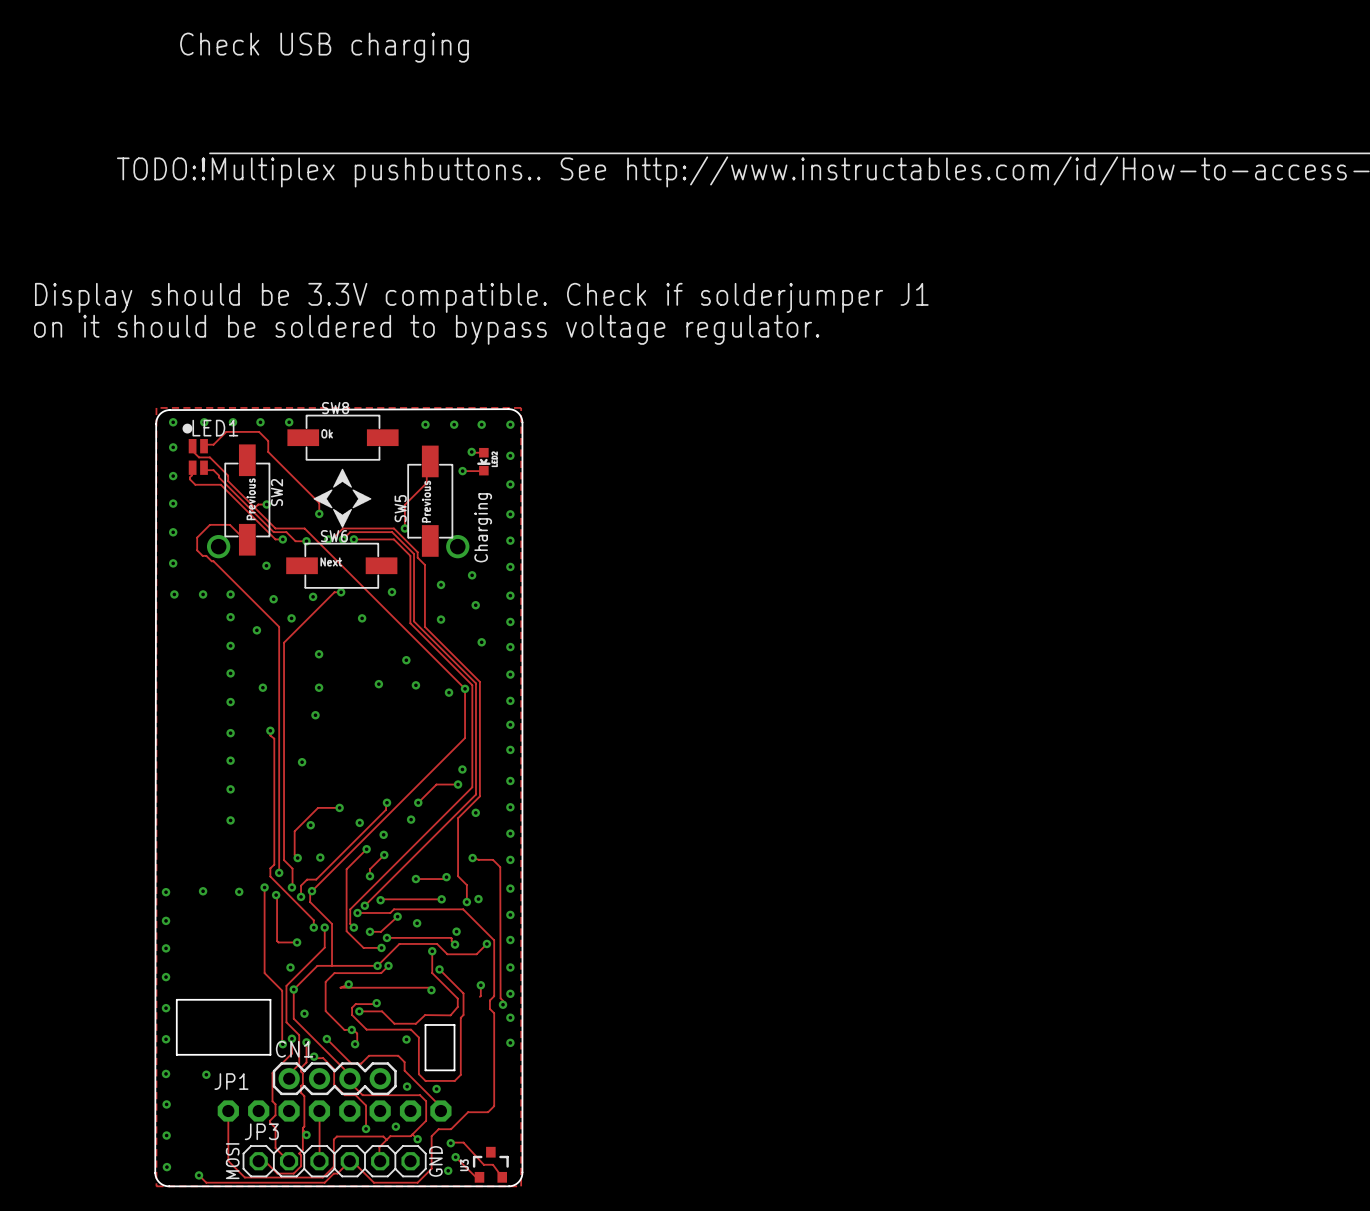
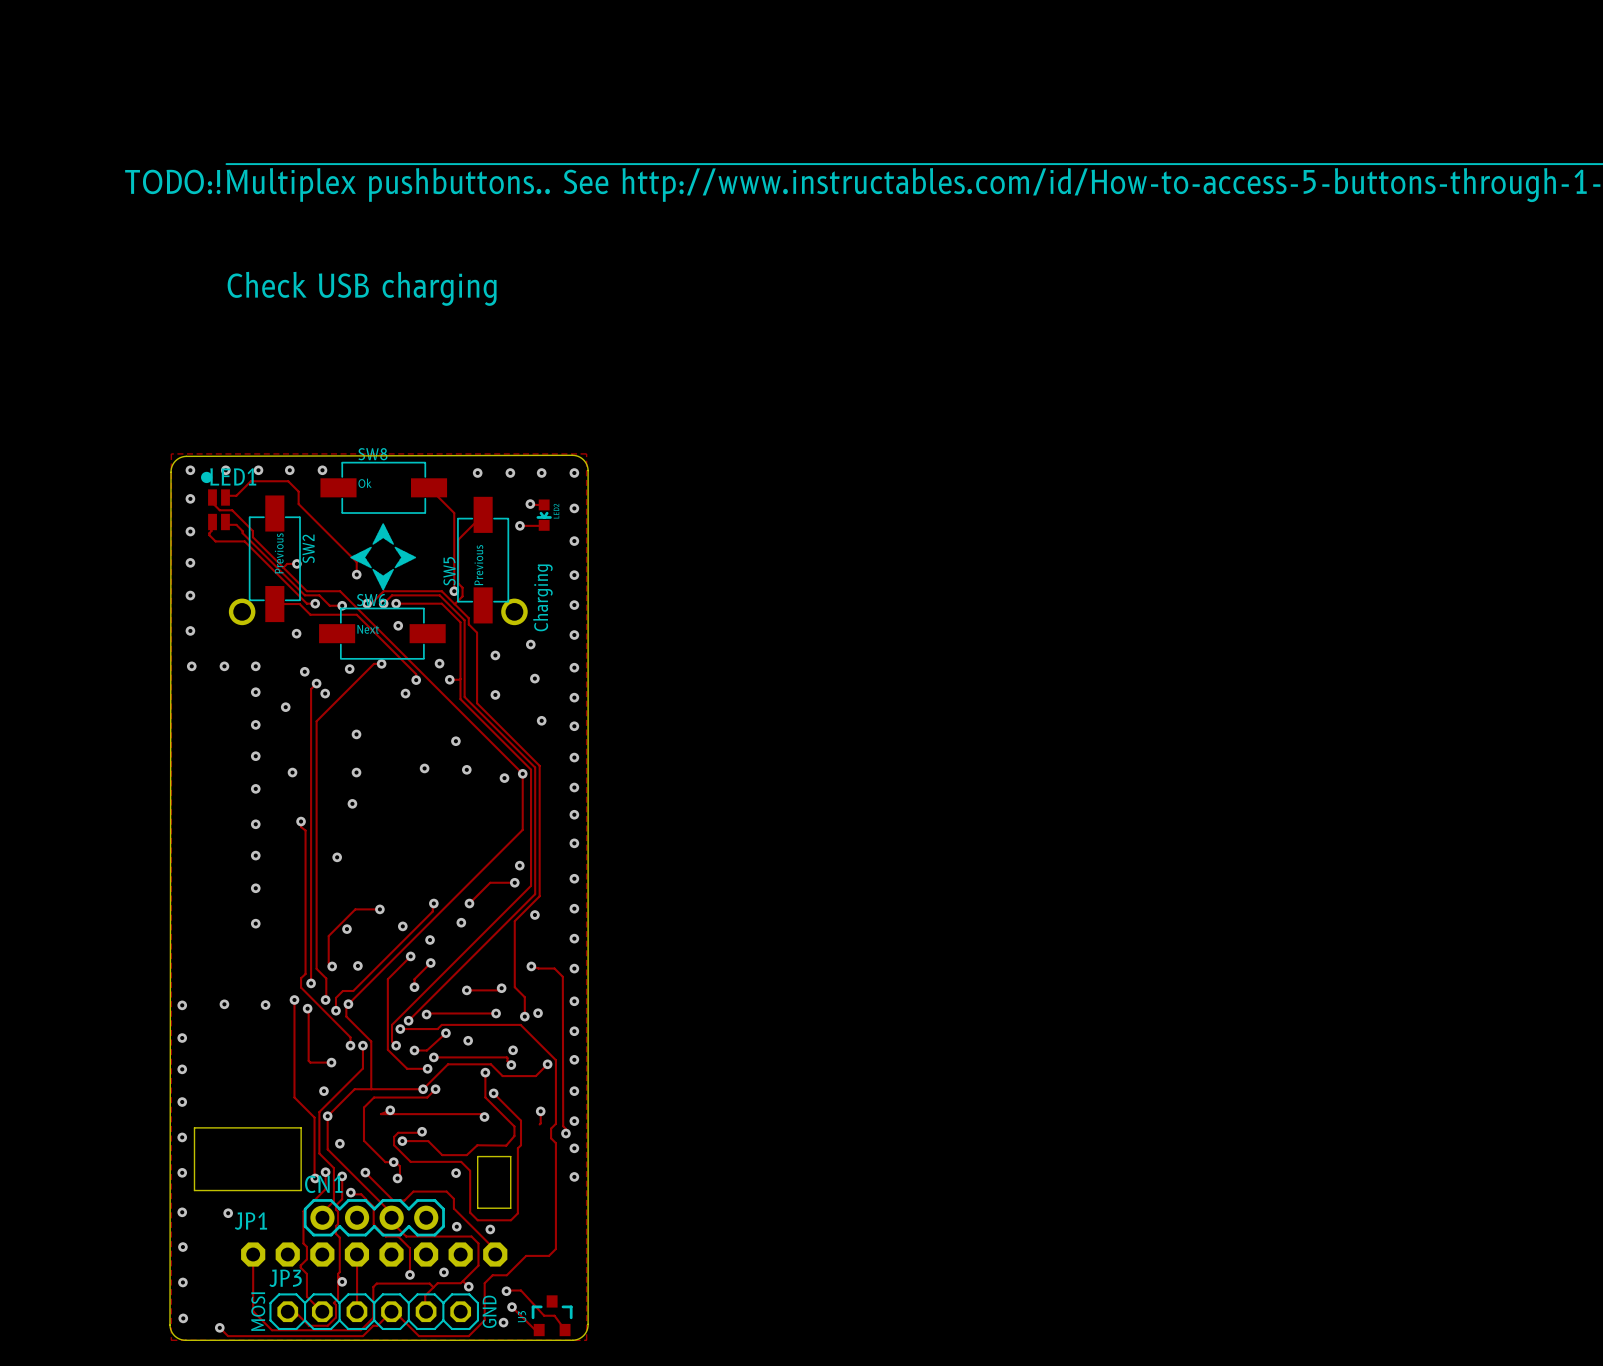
text position: Check USB charging (324, 47) -> Check USB charging (362, 288)
text: Display should be 3.3V compatible. Check if solderjumper J1 (481, 297) -> none
text: on it should be soldered to bypass voltage regulator. (426, 329) -> none
track: none -> (429, 487) (454, 513) (454, 564)
track: (430, 461) (426, 464) (426, 482) (404, 504) -> (483, 514) (458, 539) (458, 583) (462, 587) (462, 596) (454, 604)
track: (247, 539) (246, 541) (229, 524) (209, 524) (197, 537) (197, 550) (202, 555) (206, 555) (213, 561) (279, 626) -> (316, 683) (311, 689) (311, 703)
track: none -> (274, 604) (299, 604) (310, 614) (356, 614) (416, 674) (416, 680)
via: none -> (398, 625)
track: none -> (460, 679) (449, 679)
via: none -> (416, 680)
via: none -> (449, 679)
via: none -> (316, 683)

